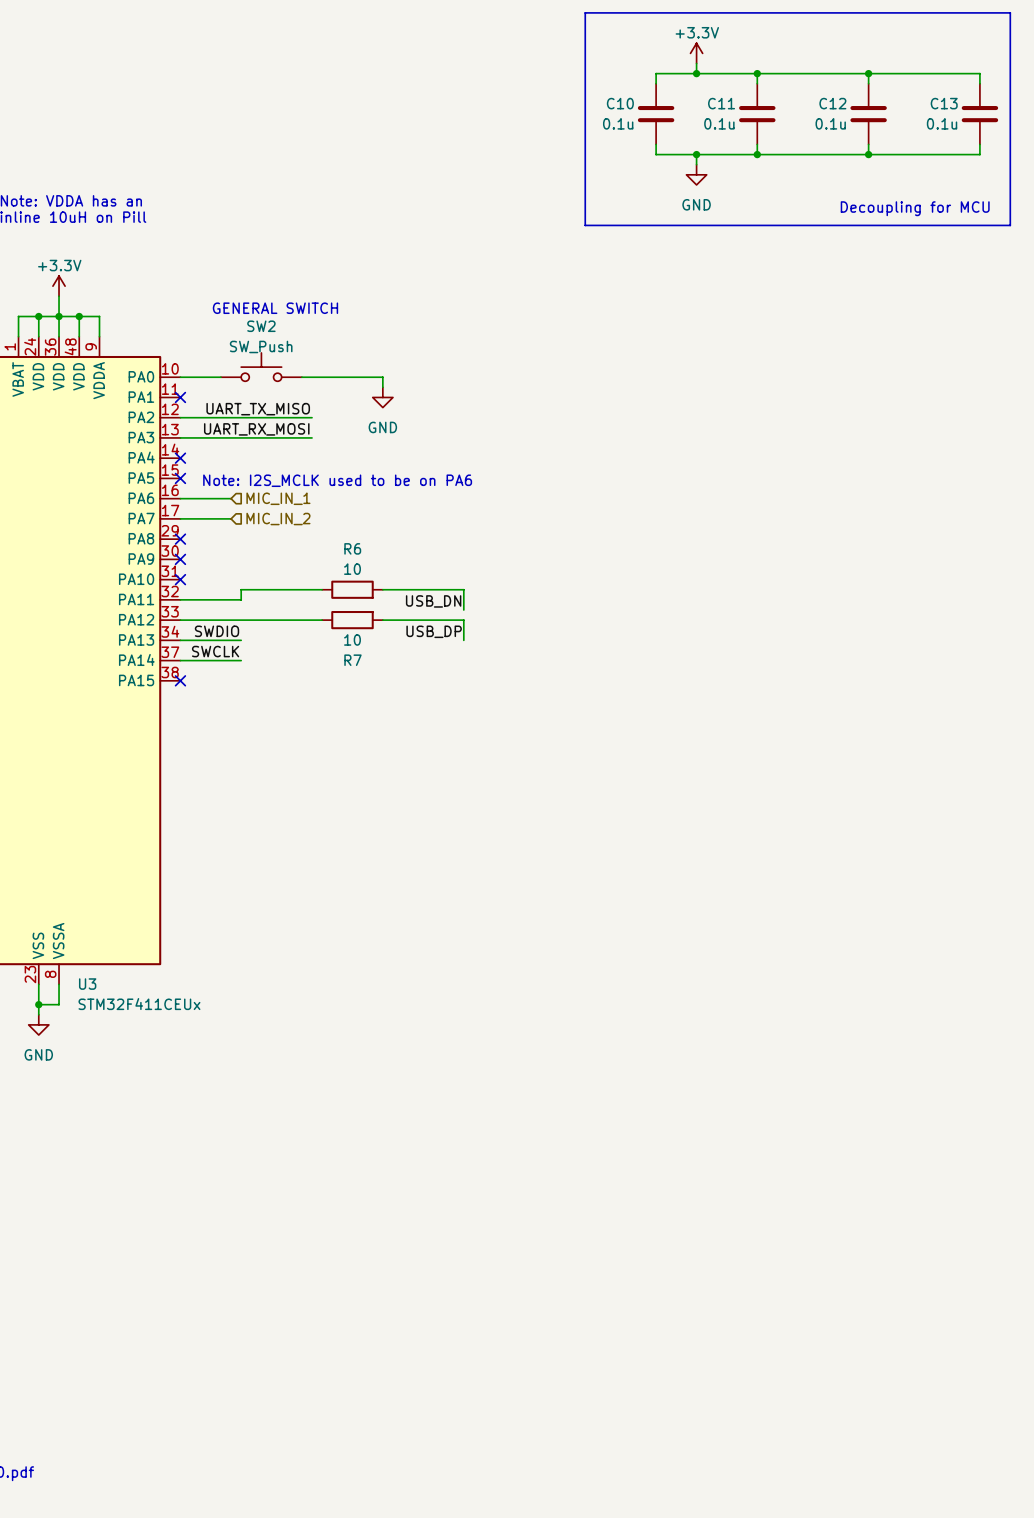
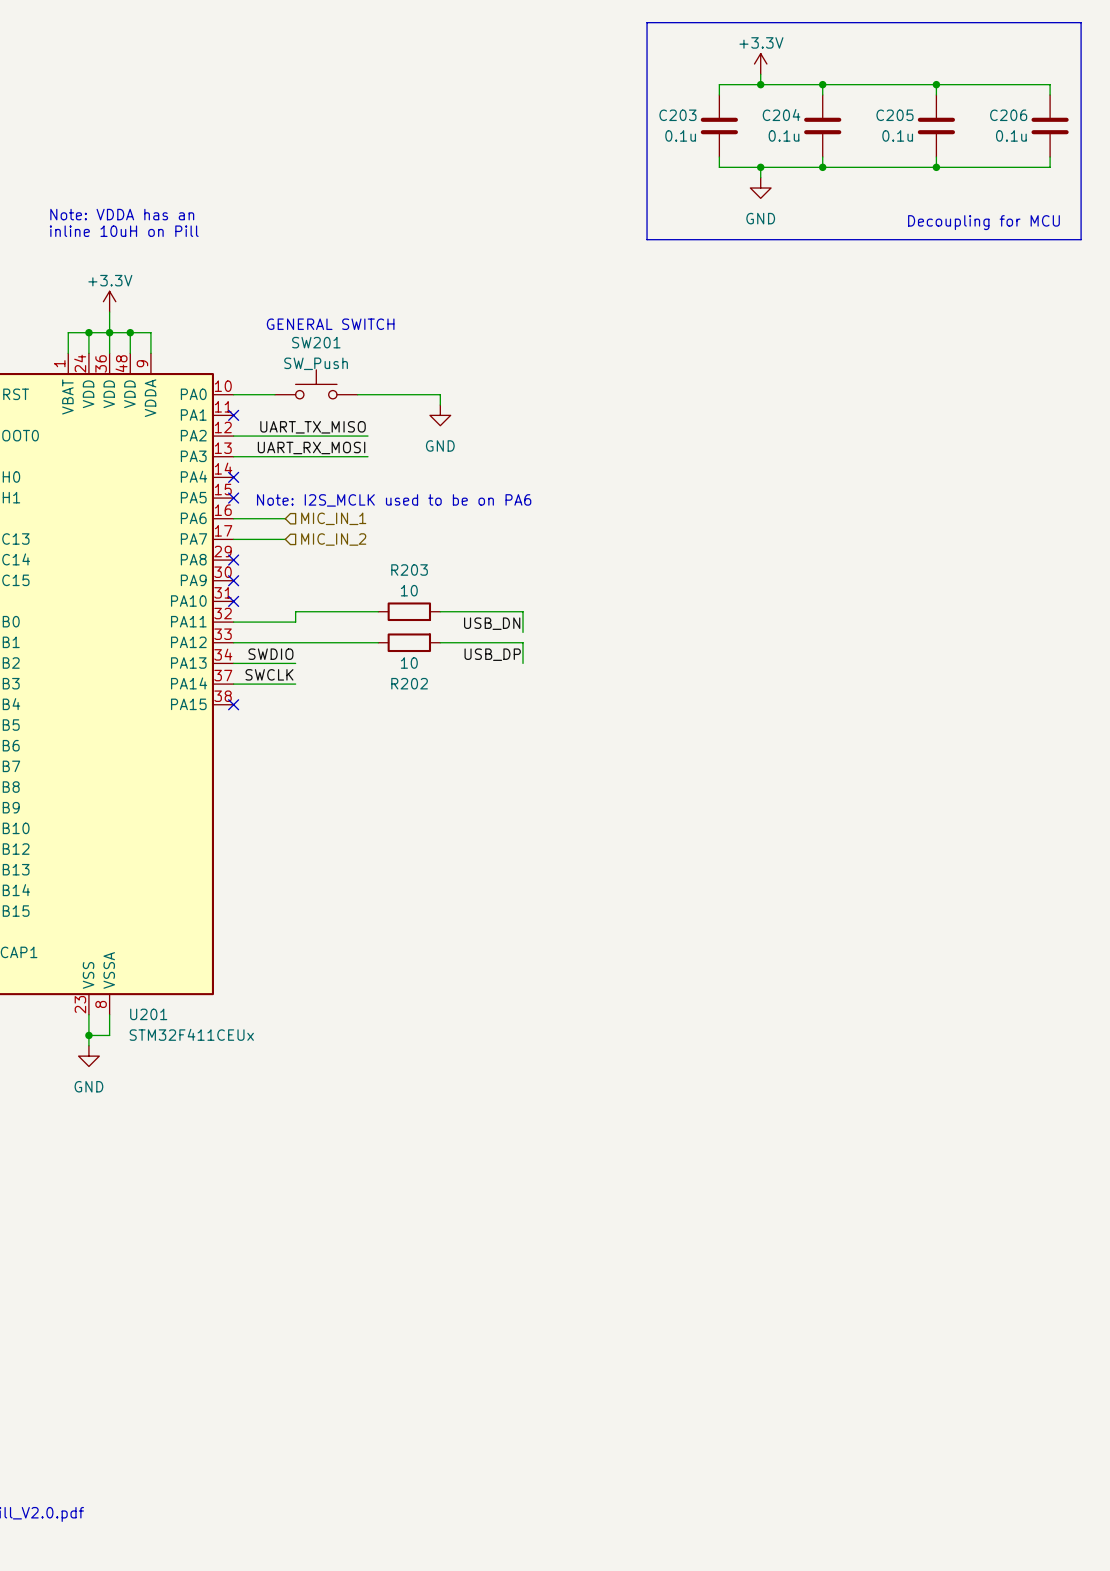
C10 name: C10 (620, 103) -> C203 (677, 115)
C11 name: C11 (721, 103) -> C204 (781, 115)
C12 name: C12 (832, 103) -> C205 (894, 115)
C13 name: C13 (944, 103) -> C206 (1008, 115)
SW2 name: SW2 (261, 326) -> SW201 (316, 342)
R6 name: R6 (352, 548) -> R203 (409, 570)
R7 name: R7 (352, 660) -> R202 (409, 683)
U3 name: U3 (87, 984) -> U201 (148, 1014)

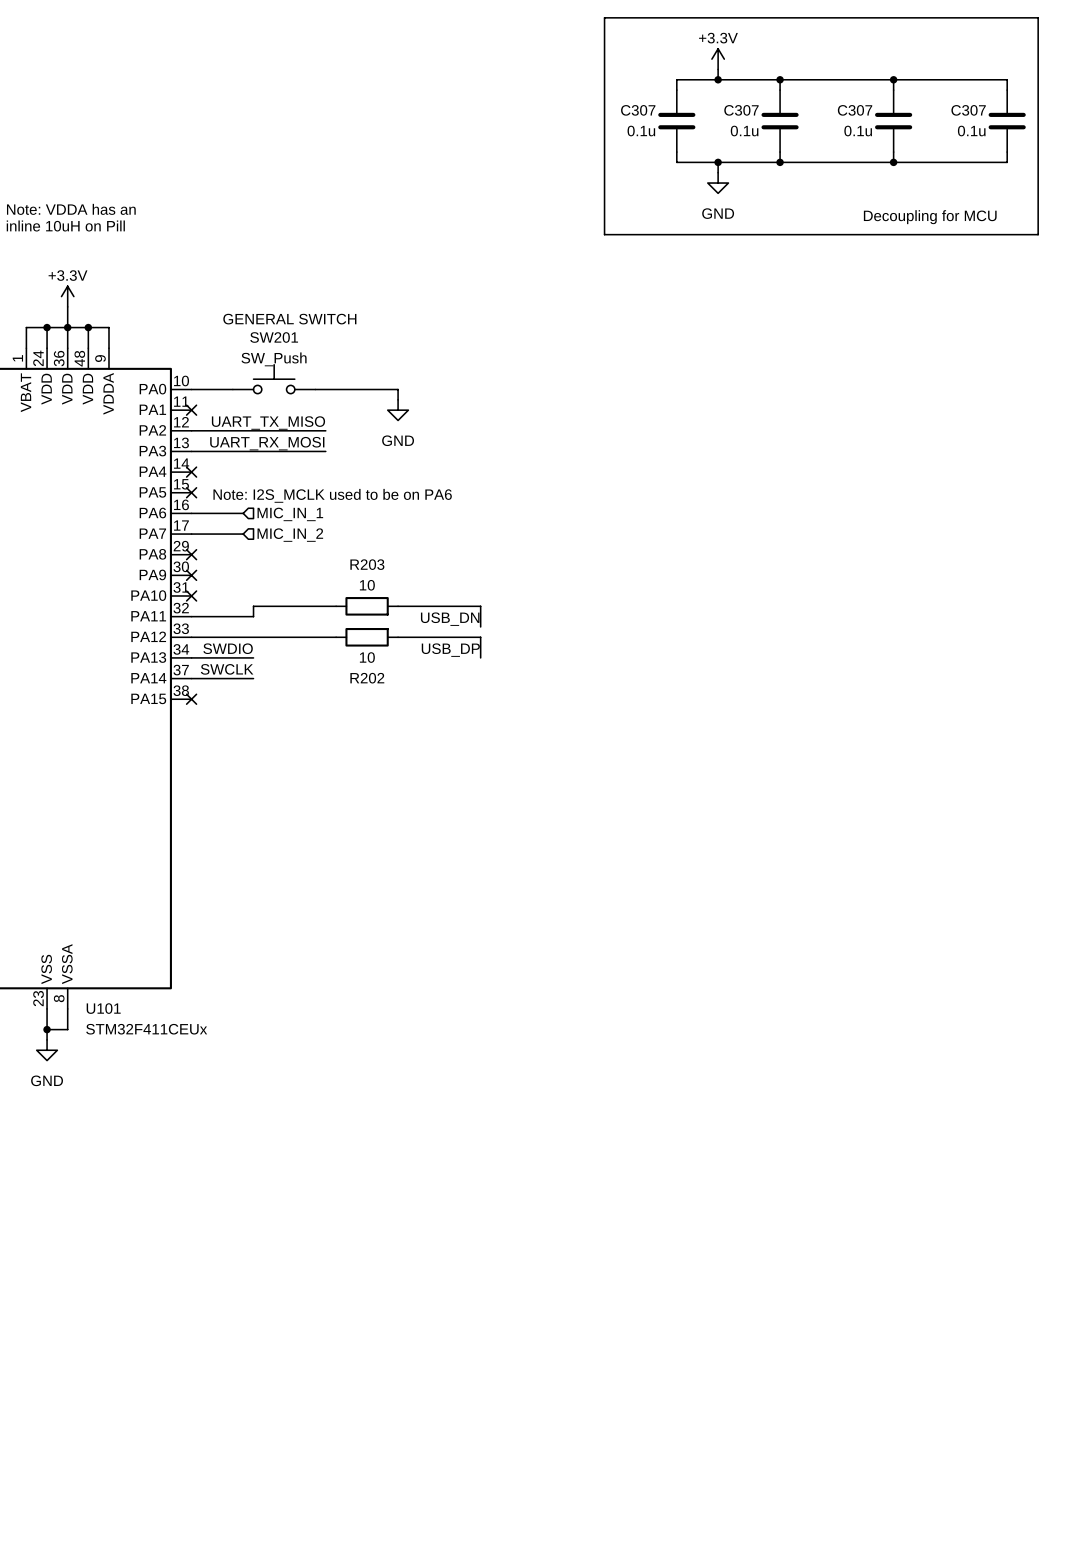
C203 name: C203 (677, 115) -> C307 (638, 110)
C204 name: C204 (781, 115) -> C307 (741, 110)
C205 name: C205 (894, 115) -> C307 (855, 110)
C206 name: C206 (1008, 115) -> C307 (968, 110)
U201 name: U201 (148, 1014) -> U101 (103, 1008)

